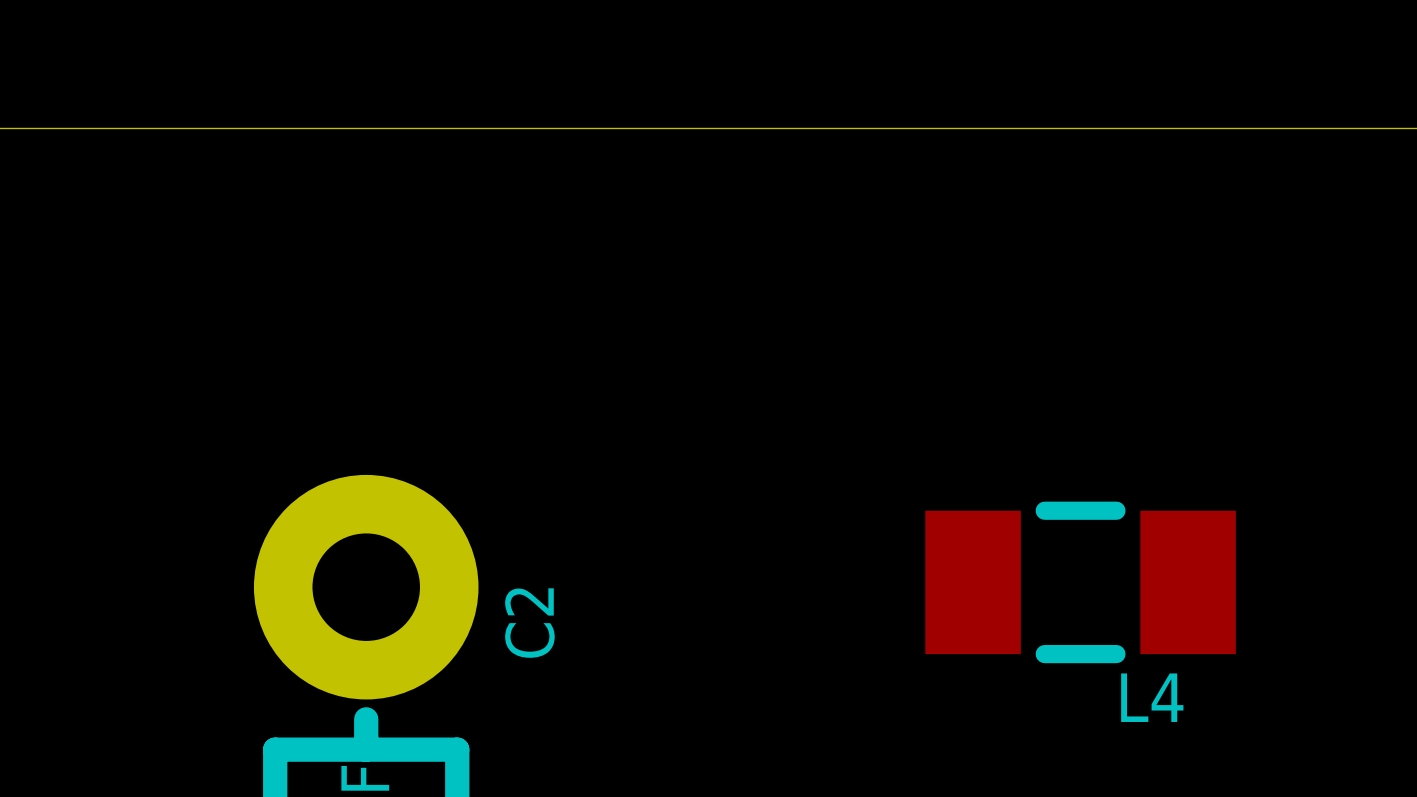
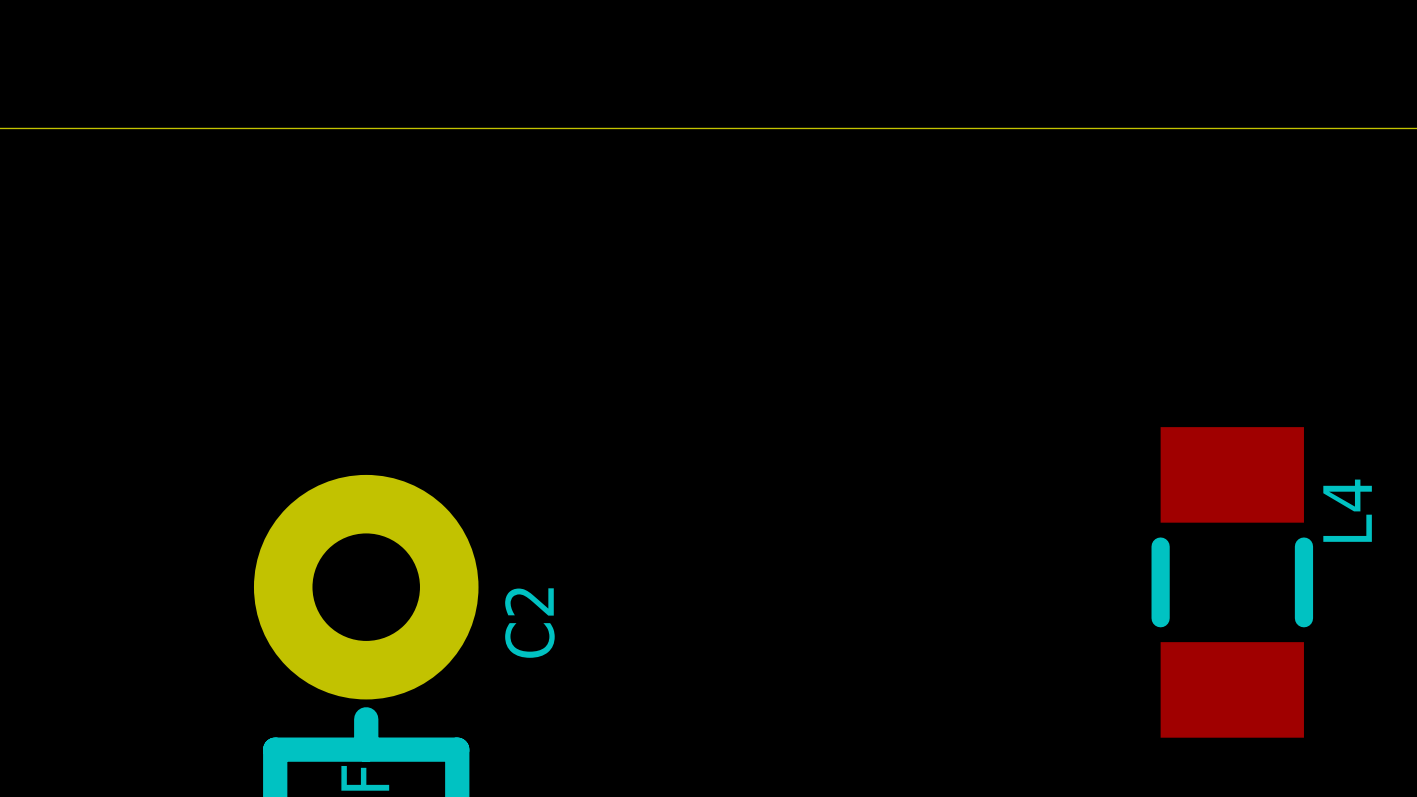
L4 rotation: 0° (1080, 582) -> 90° clockwise (1232, 582)

